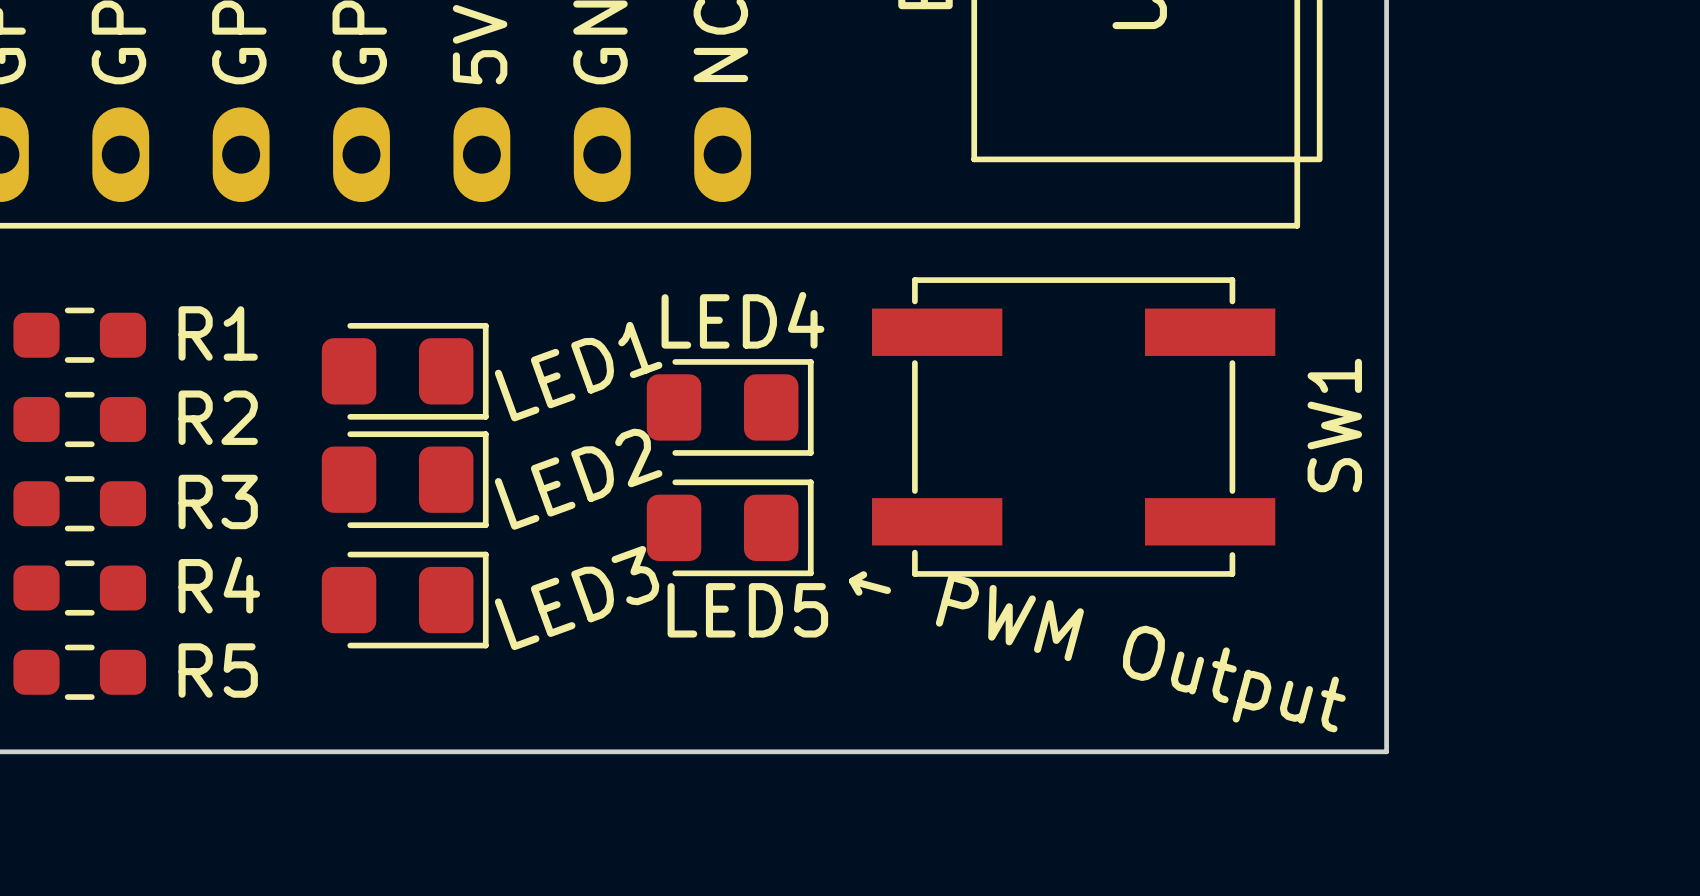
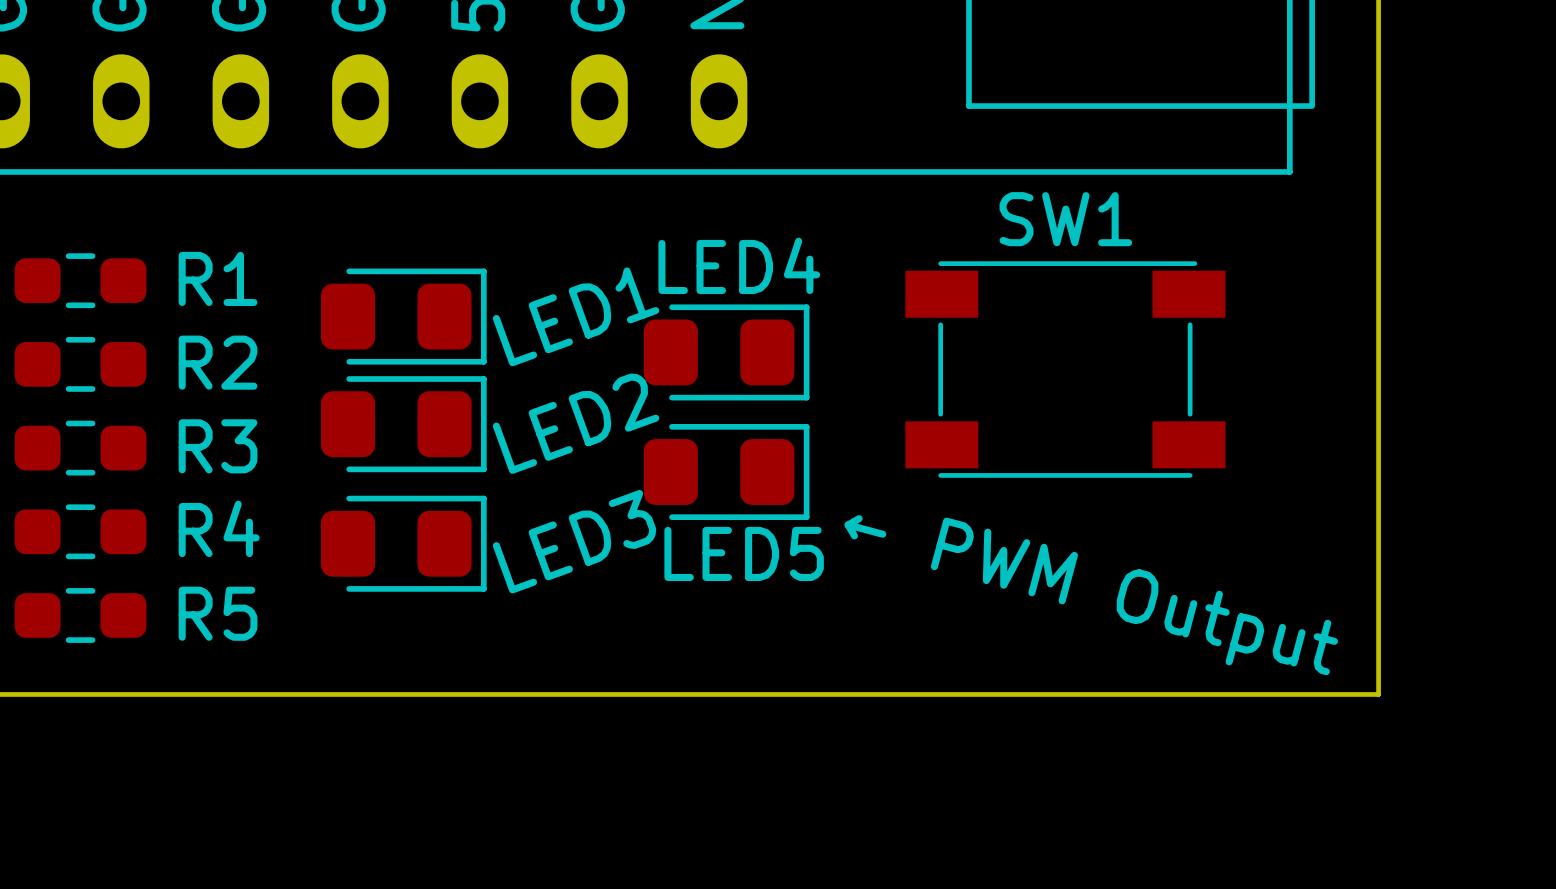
SW1 footprint: [872, 277, 1276, 577] -> [905, 261, 1226, 478]
SW1 name position: SW1 (1334, 425) -> SW1 (1065, 219)

